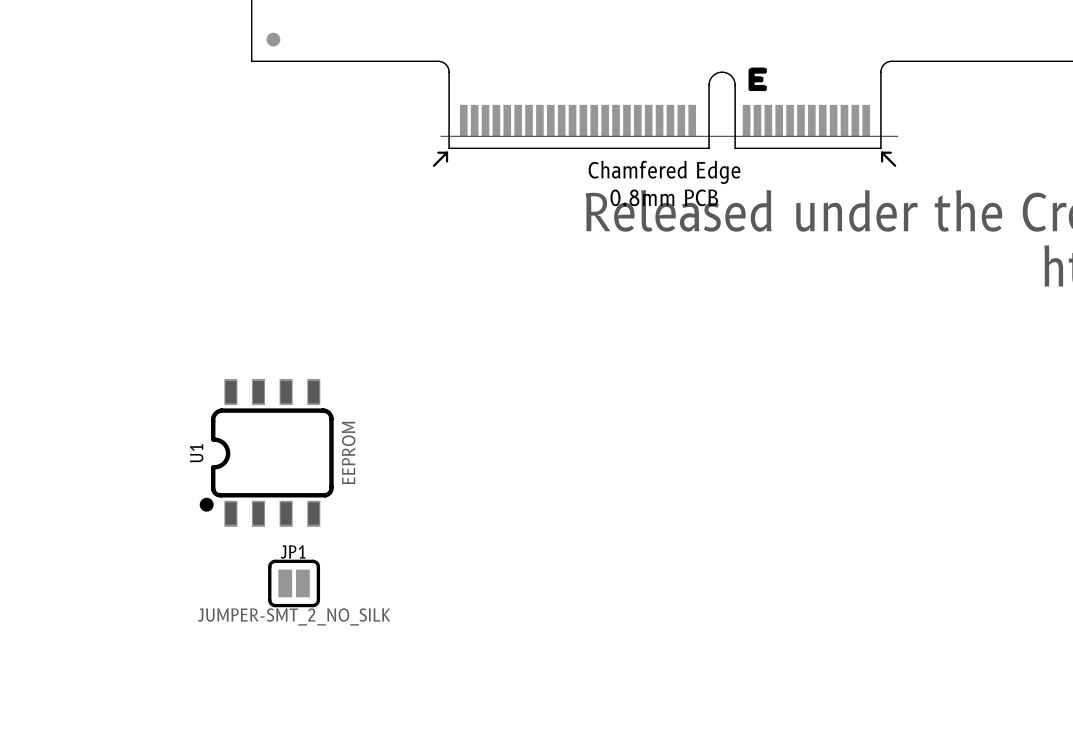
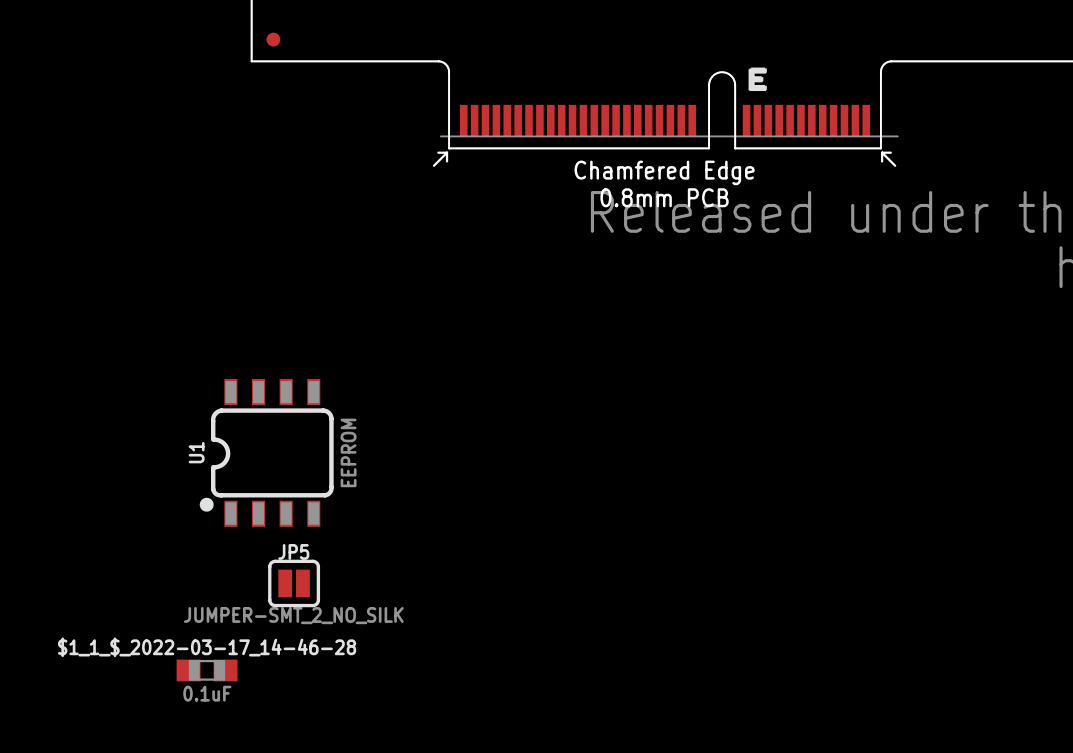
JP1 name: JP1 (293, 552) -> JP5 (293, 551)
$1_1_$_2022-03-17_14-46-28: none -> 0.1uF (207, 670)

